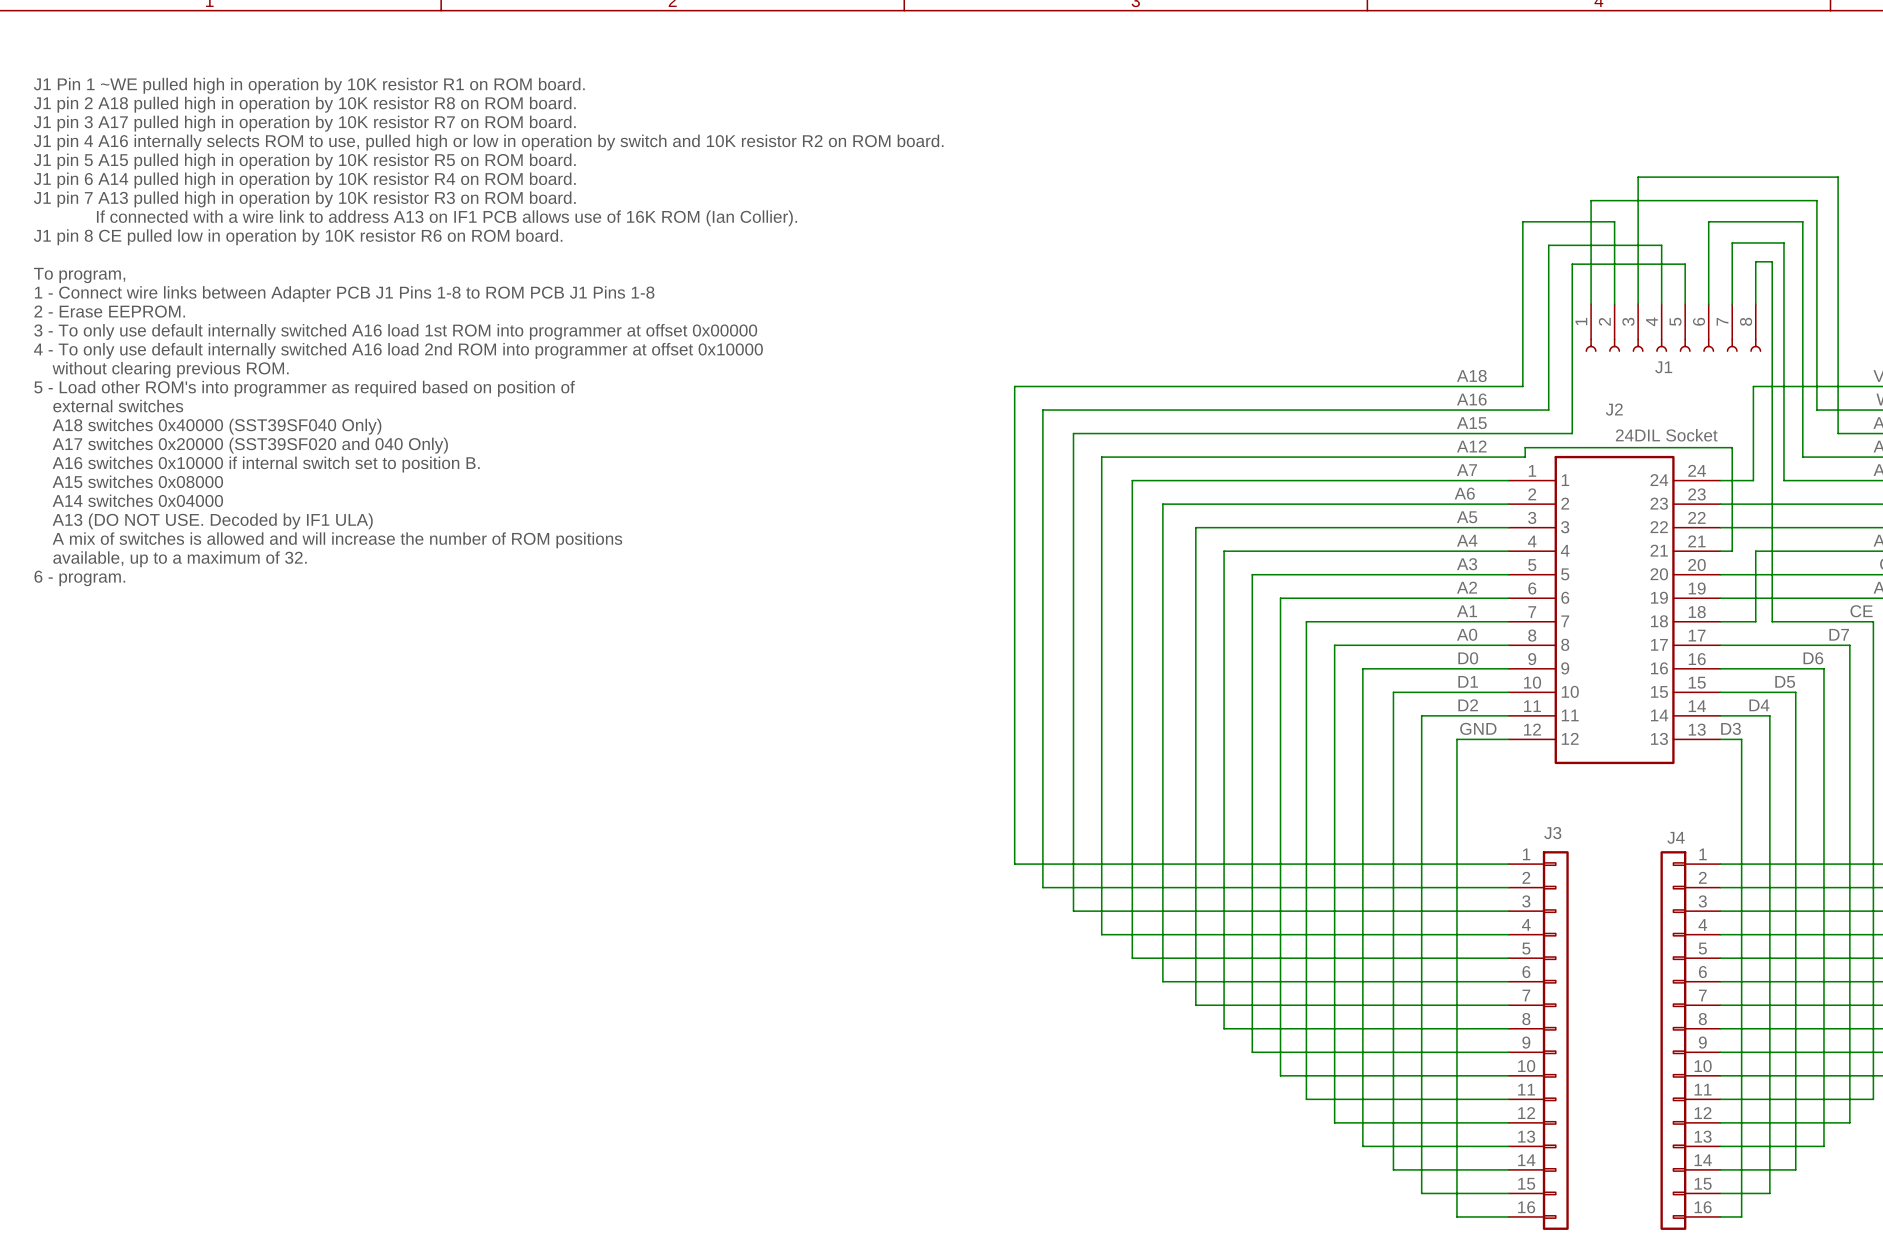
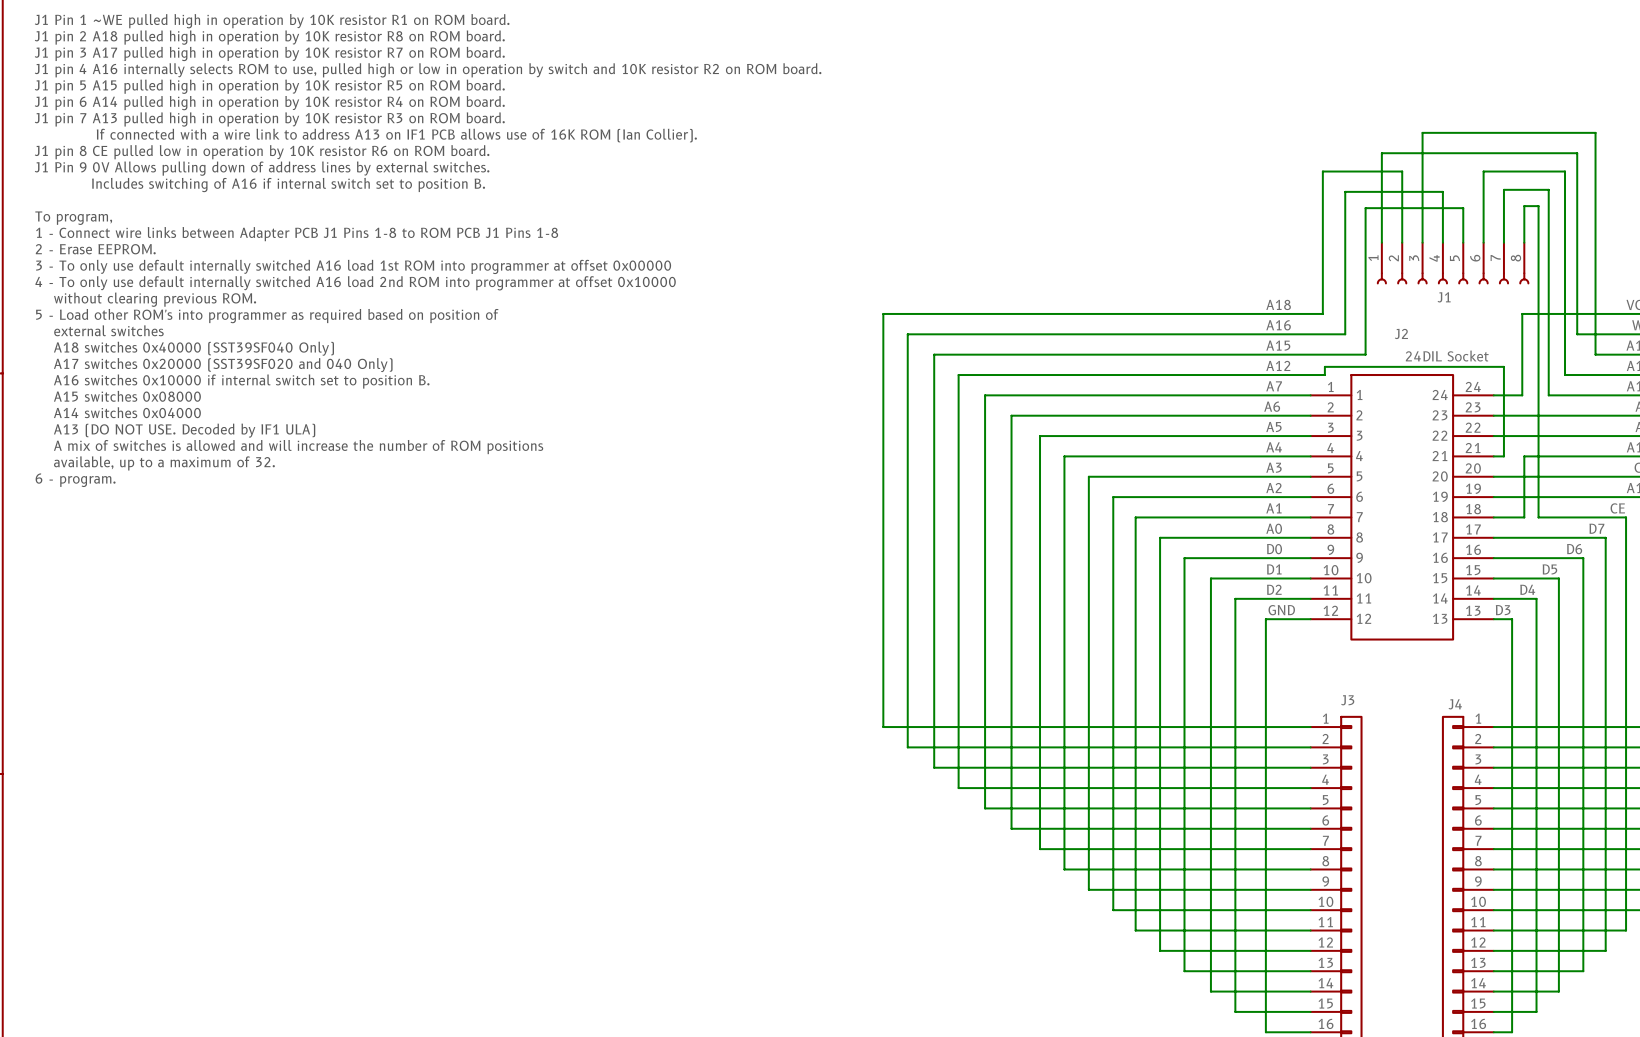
text: none -> J1 Pin 1 ~WE pulled high in operation by 10K resistor R1 on ROM board. (272, 21)
text: none -> J1 pin 2 A18 pulled high in operation by 10K resistor R8 on ROM board. (269, 37)
text: J1 Pin 1 ~WE pulled high in operation by 10K resistor R1 on ROM board. (309, 85) -> J1 pin 3 A17 pulled high in operation by 10K resistor R7 on ROM board. (269, 53)
text: J1 pin 2 A18 pulled high in operation by 10K resistor R8 on ROM board. (304, 104) -> J1 pin 4 A16 internally selects ROM to use, pulled high or low in operation by switch and 10K resistor R2 on ROM board. (428, 70)
text: J1 pin 3 A17 pulled high in operation by 10K resistor R7 on ROM board. (304, 123) -> J1 pin 5 A15 pulled high in operation by 10K resistor R5 on ROM board. (269, 86)
text: J1 pin 4 A16 internally selects ROM to use, pulled high or low in operation by switch and 10K resistor R2 on ROM board. (488, 142) -> J1 pin 6 A14 pulled high in operation by 10K resistor R4 on ROM board. (269, 103)
text: J1 pin 5 A15 pulled high in operation by 10K resistor R5 on ROM board. (304, 161) -> J1 pin 7 A13 pulled high in operation by 10K resistor R3 on ROM board. (269, 119)
text: J1 pin 6 A14 pulled high in operation by 10K resistor R4 on ROM board. (304, 180) -> If connected with a wire link to address A13 on IF1 PCB allows use of 16K ROM (Ian Collier). (396, 135)
text: J1 pin 7 A13 pulled high in operation by 10K resistor R3 on ROM board. (304, 199) -> J1 pin 8 CE pulled low in operation by 10K resistor R6 on ROM board. (262, 152)
text: If connected with a wire link to address A13 on IF1 PCB allows use of 16K ROM (Ian Collier). (447, 218) -> J1 Pin 9 0V Allows pulling down of address lines by external switches. (262, 168)
text: J1 pin 8 CE pulled low in operation by 10K resistor R6 on ROM board. (298, 237) -> Includes switching of A16 if internal switch set to position B. (288, 185)

